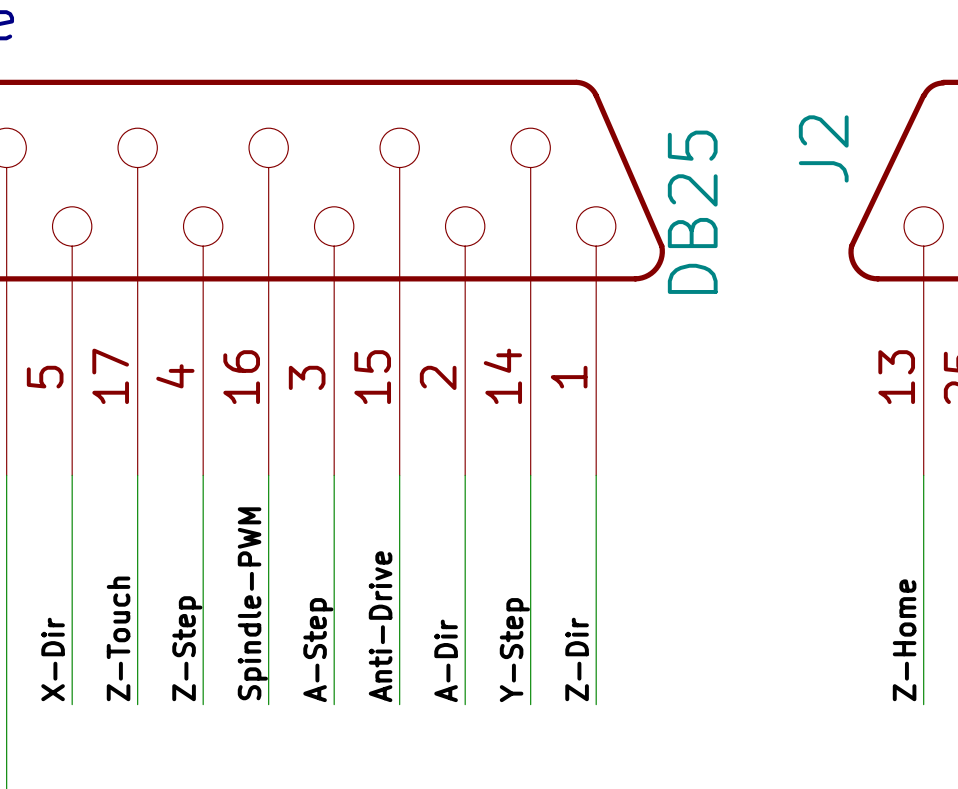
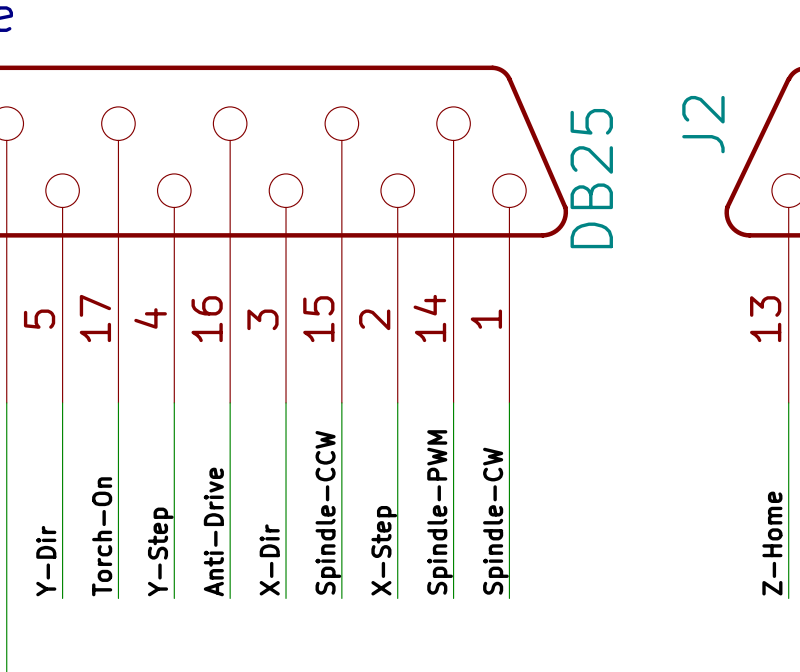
label: Spindle-PWM (252, 603) -> Anti-Drive (213, 531)
label: Anti-Drive (380, 626) -> Spindle-CCW (328, 512)
label: Z-Touch (118, 638) -> Torch-On (102, 536)
label: Z-Step (187, 648) -> Y-Step (160, 551)
label: A-Step (318, 650) -> X-Dir (269, 559)
label: Y-Step (514, 650) -> Spindle-PWM (440, 512)
label: X-Dir (53, 659) -> Y-Dir (46, 561)
label: Z-Dir (577, 659) -> Spindle-CW (495, 521)
label: A-Dir (446, 660) -> X-Step (384, 550)

